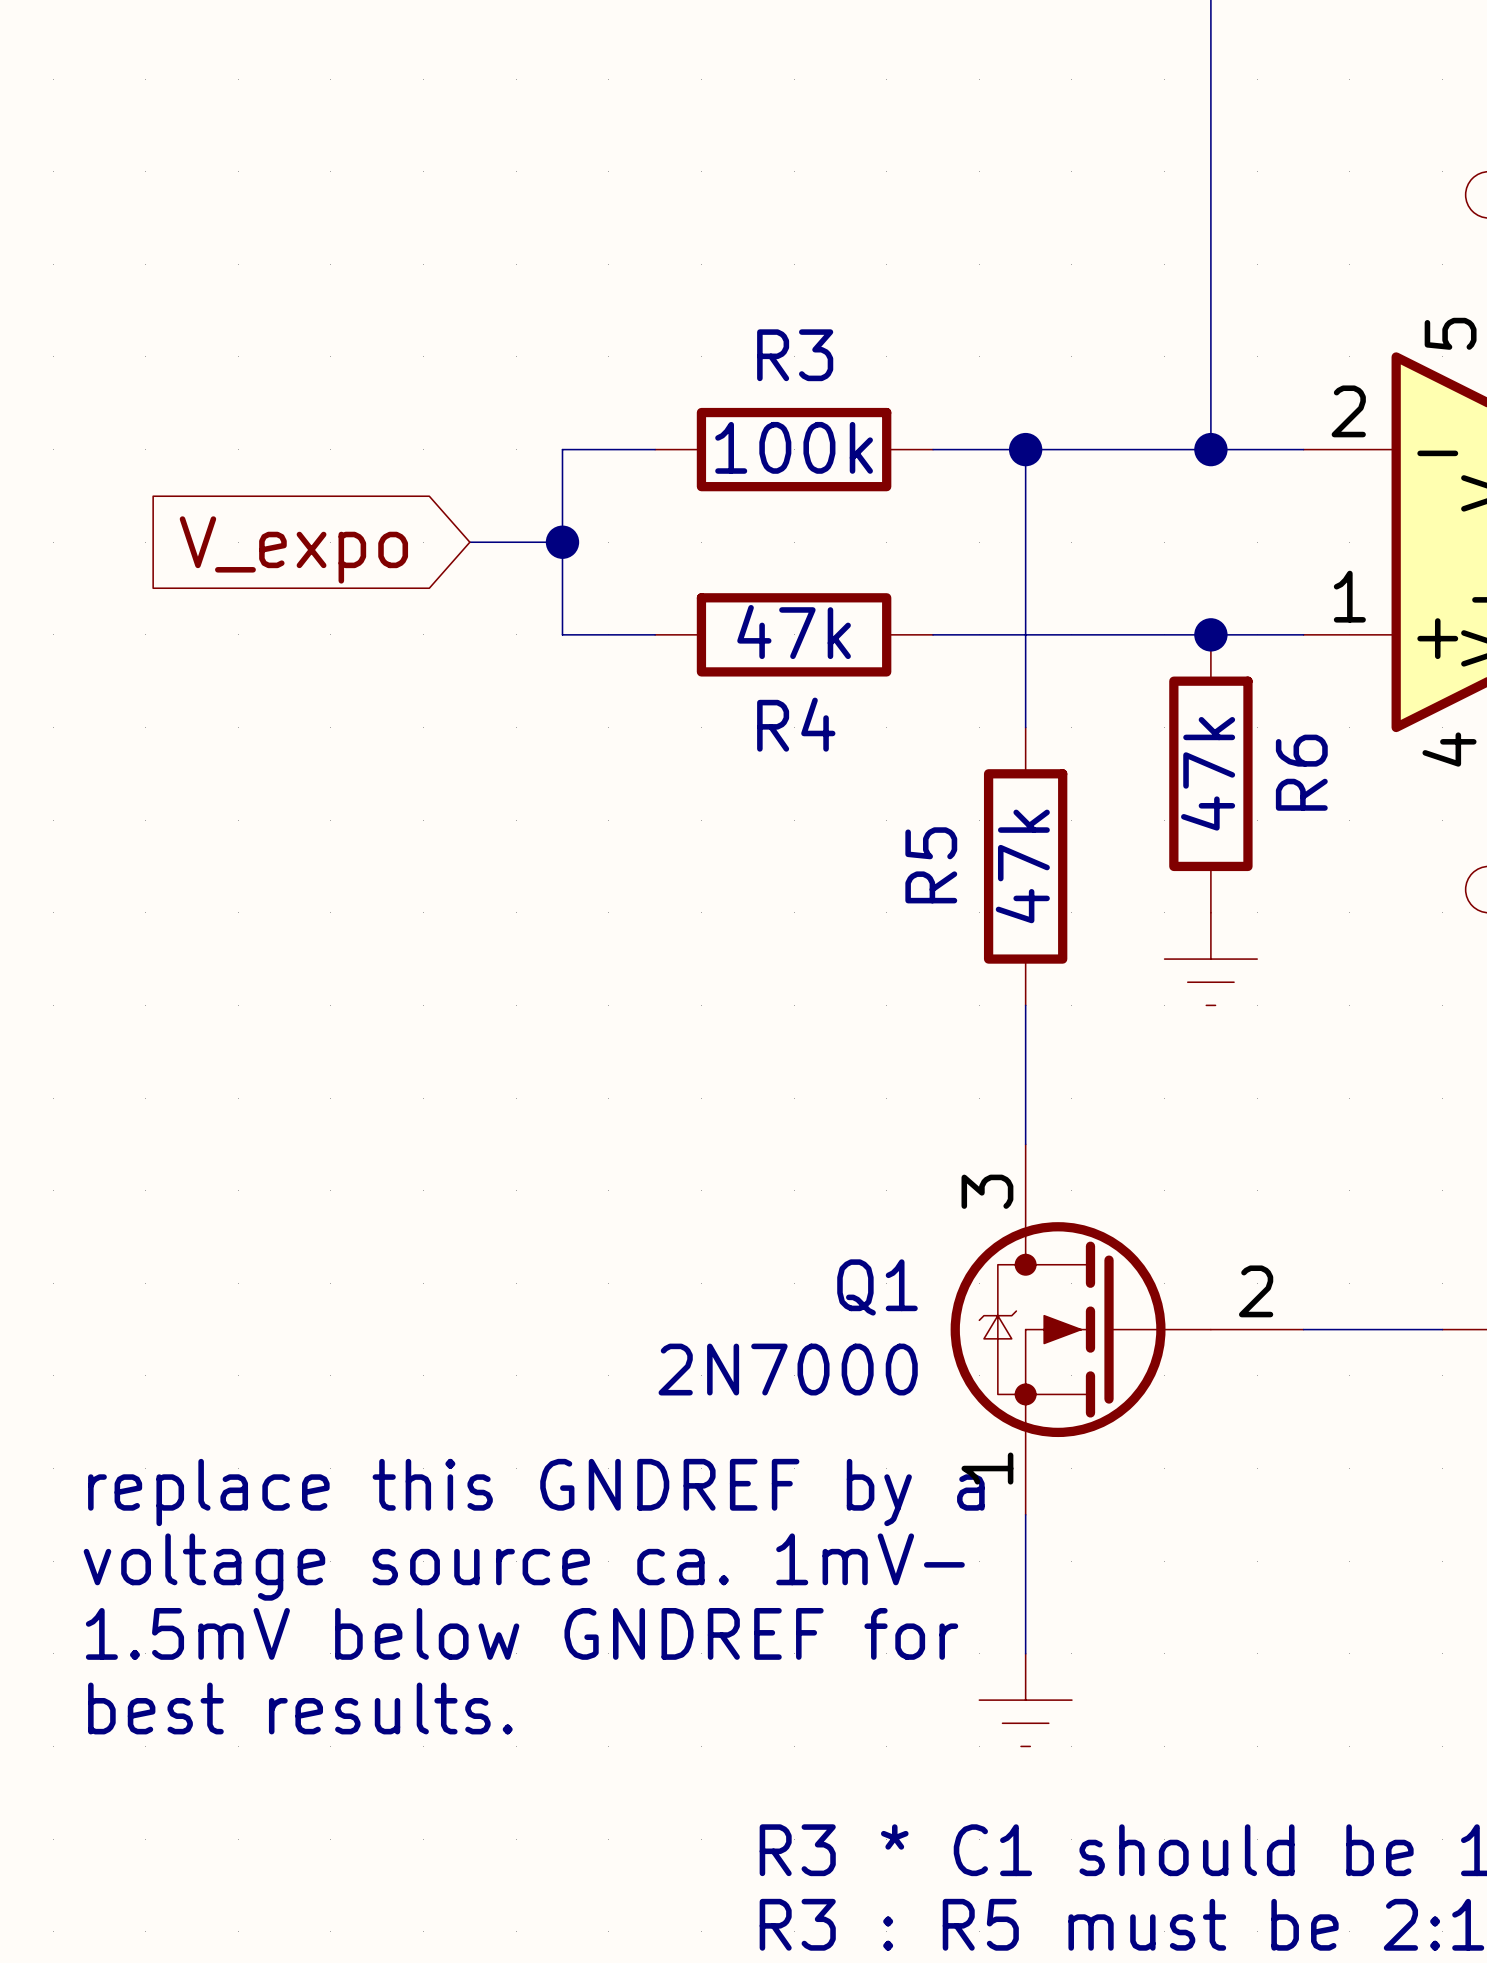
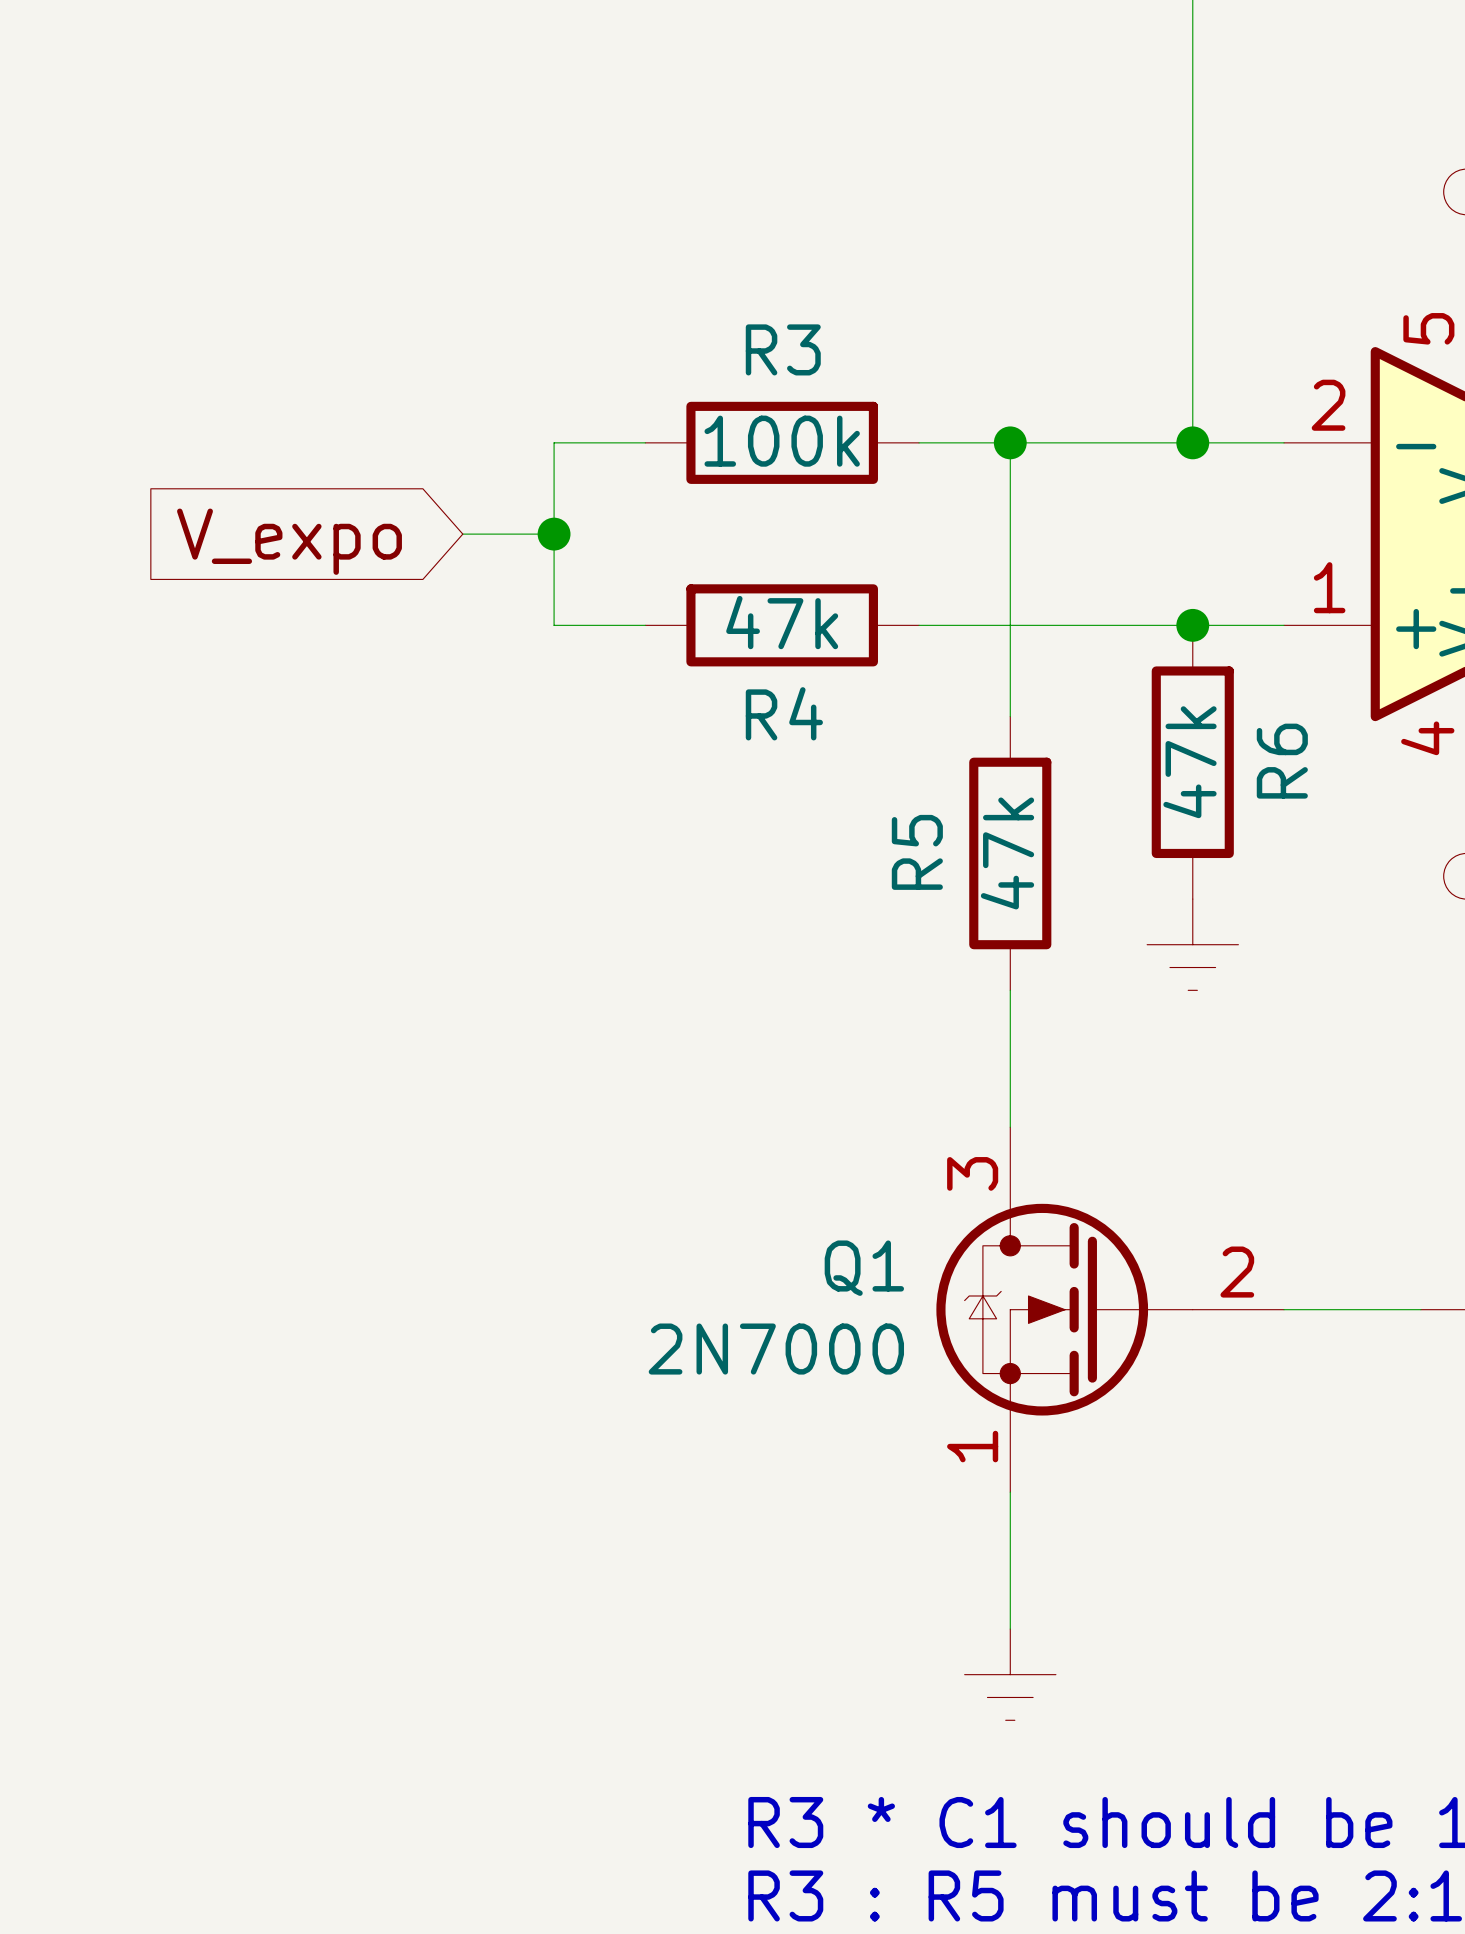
text: replace this GNDREF by a (536, 1492) -> none
text: voltage source ca. 1mV- (524, 1567) -> none
text: 1.5mV below GNDREF for (522, 1633) -> none
text: best results. (300, 1708) -> none

